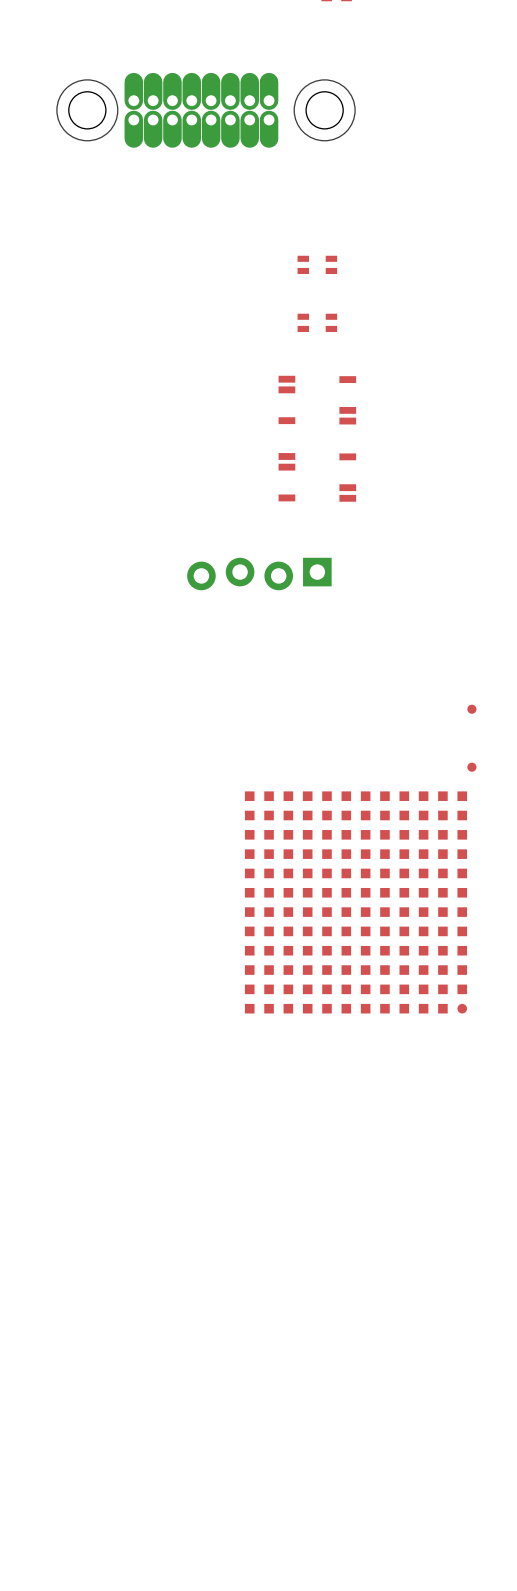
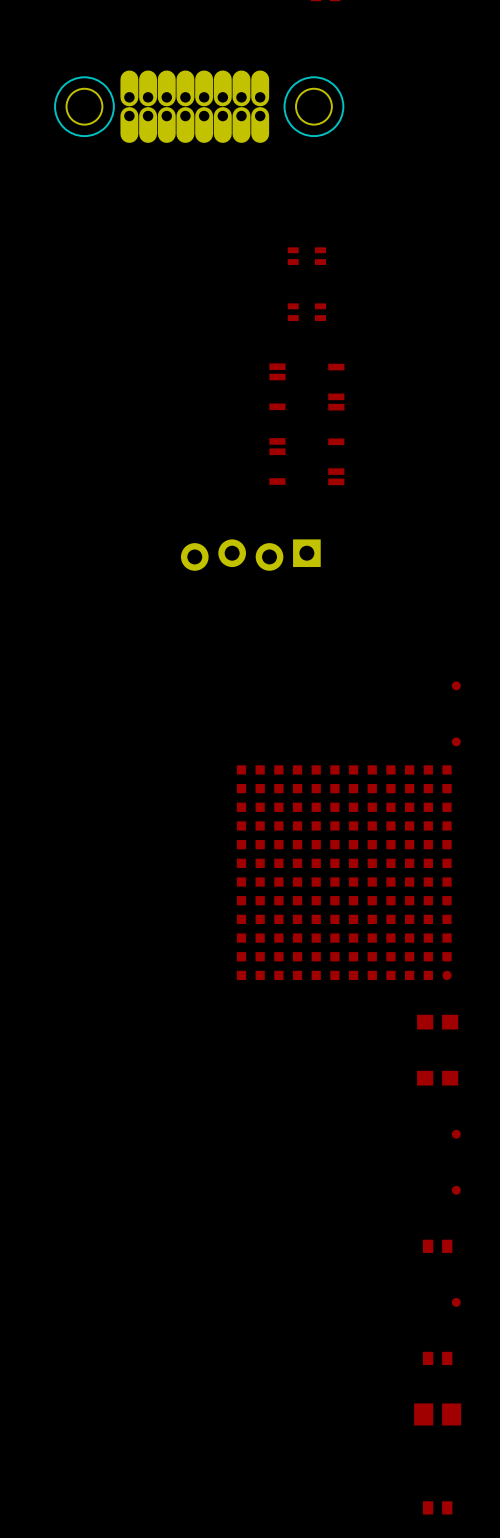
part: none -> (437, 1022)
part: none -> (437, 1078)
part: none -> (456, 1134)
part: none -> (456, 1190)
part: none -> (437, 1246)
part: none -> (456, 1302)
part: none -> (437, 1358)
part: none -> (437, 1414)
part: none -> (437, 1507)

